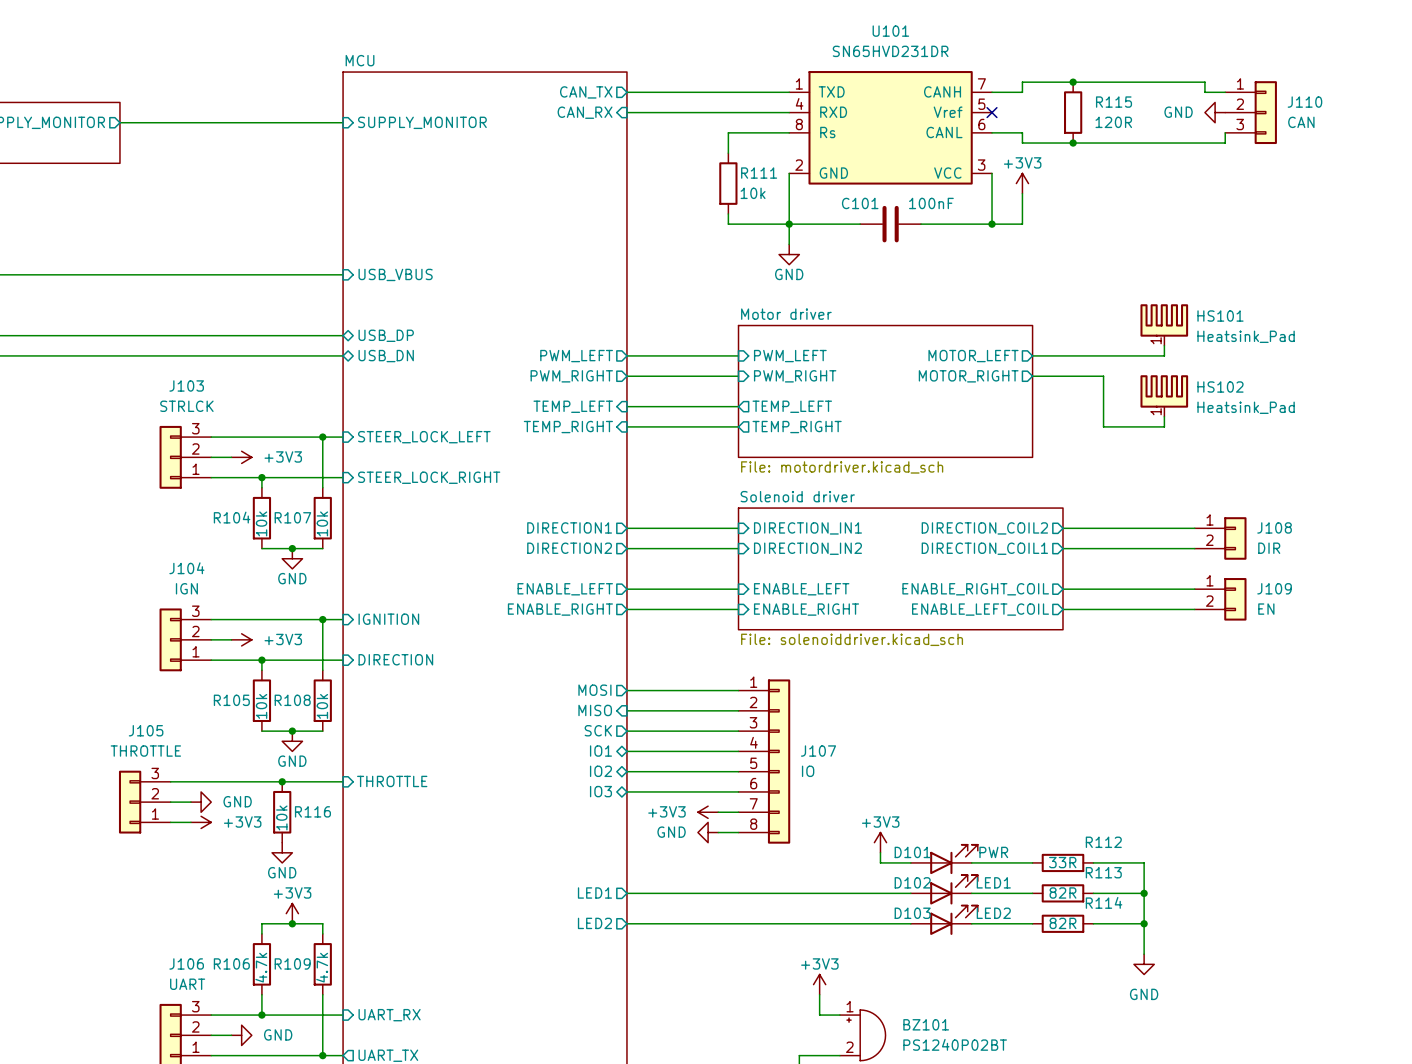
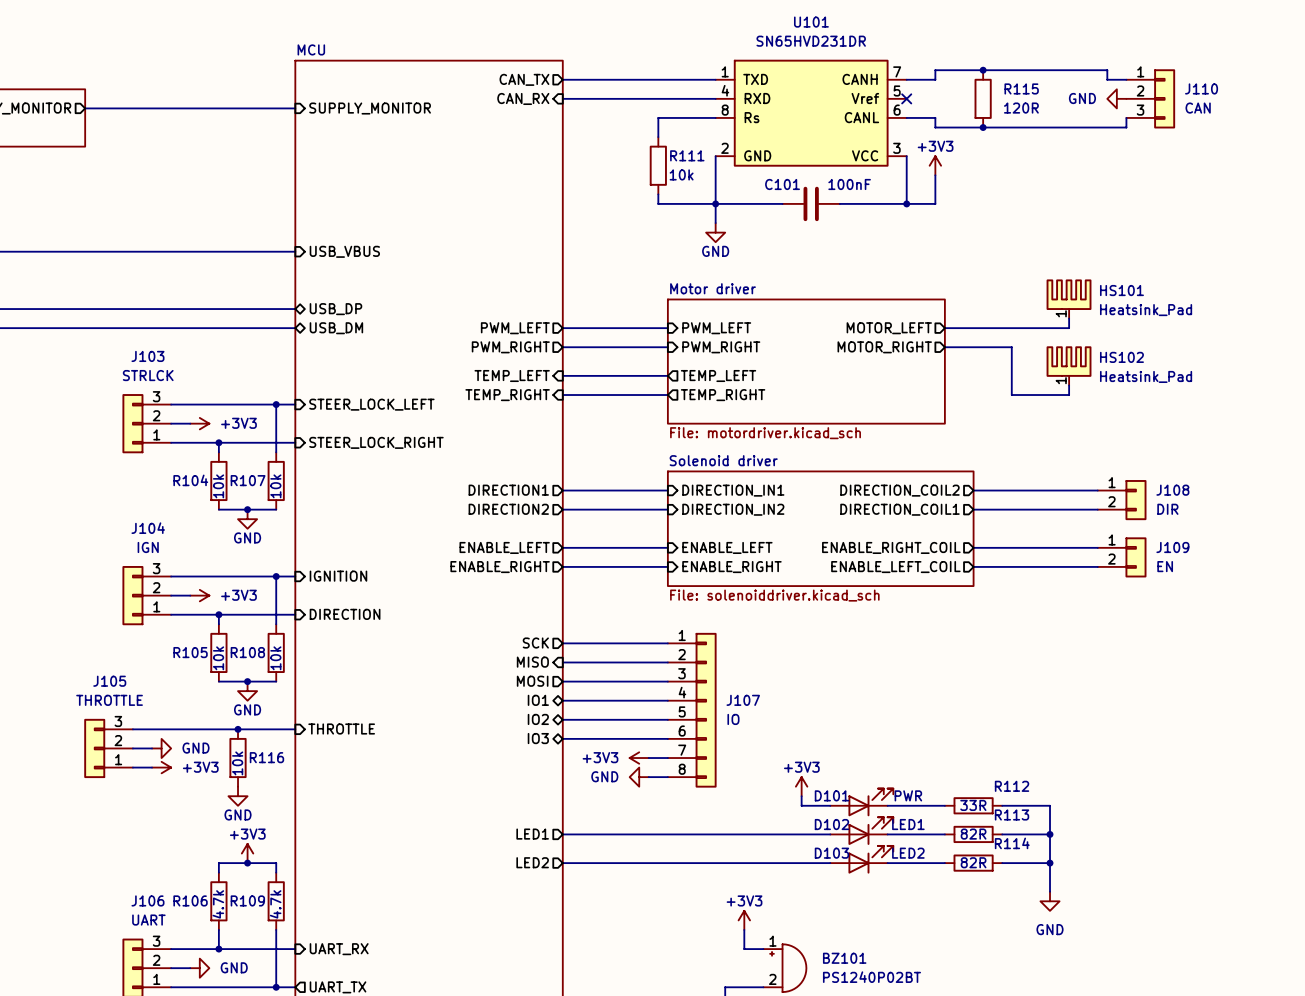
sheet pin: USB_DN (386, 356) -> USB_DM (336, 328)
sheet pin: MOSI (594, 690) -> SCK (535, 643)
sheet pin: SCK (598, 730) -> MOSI (532, 681)

